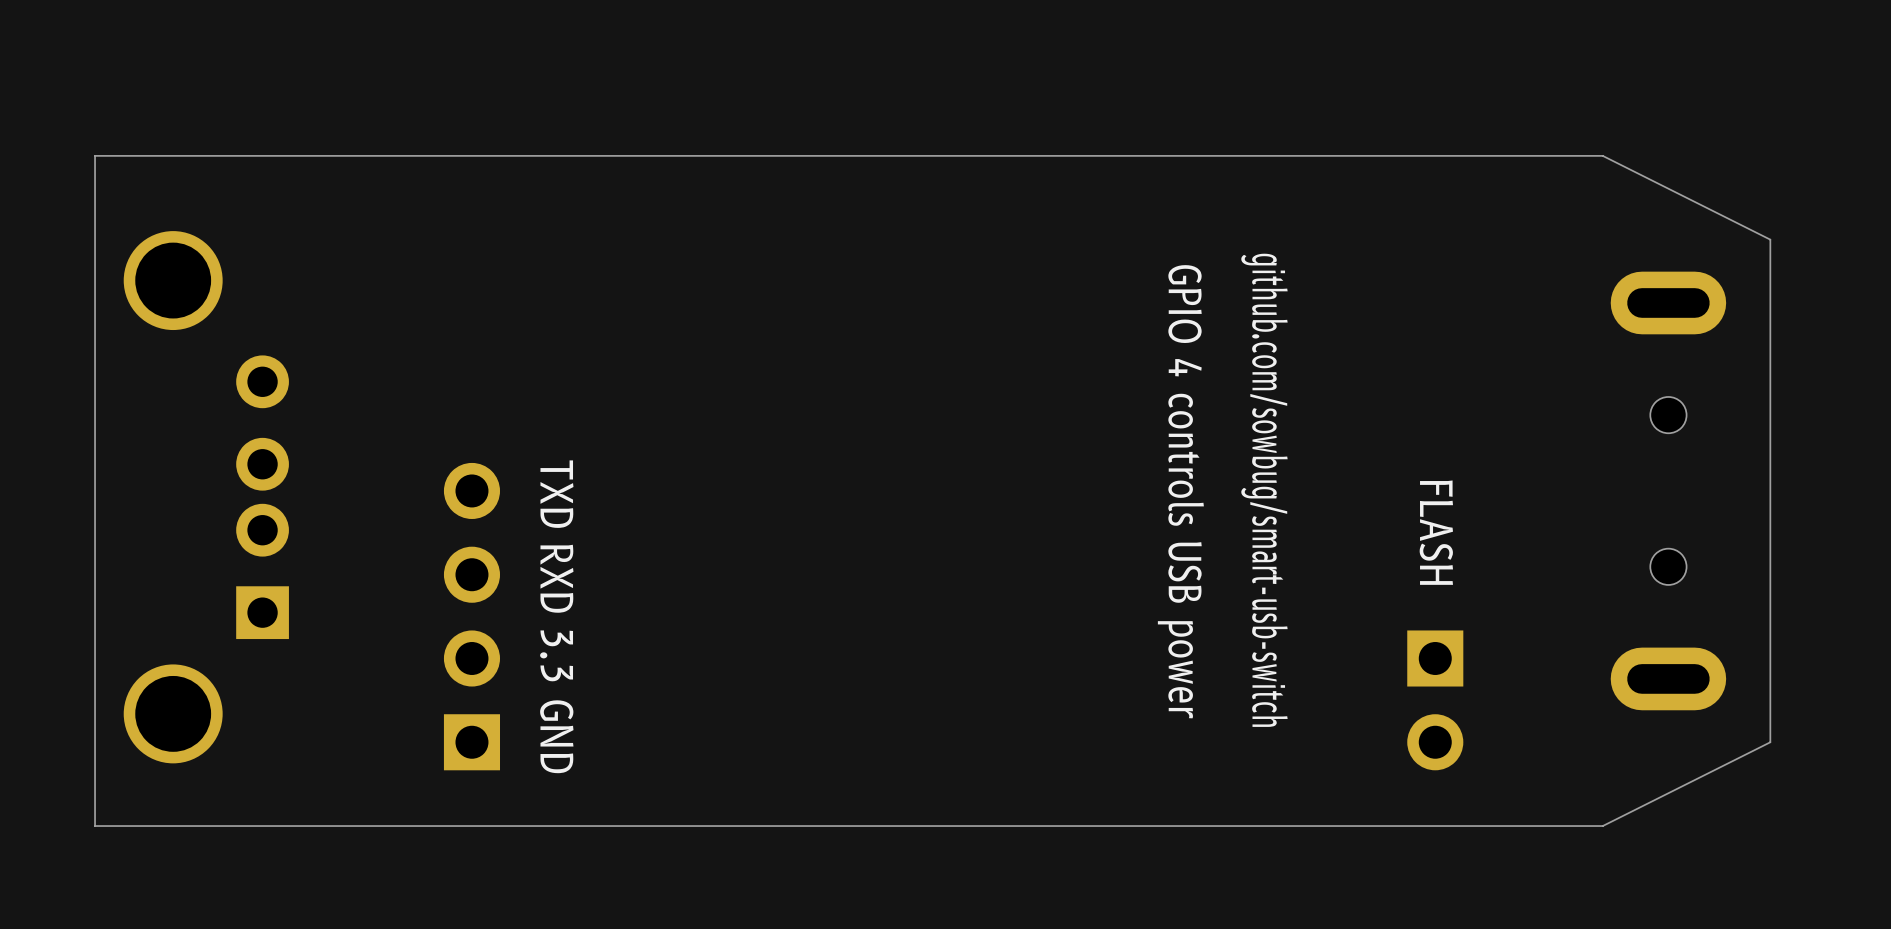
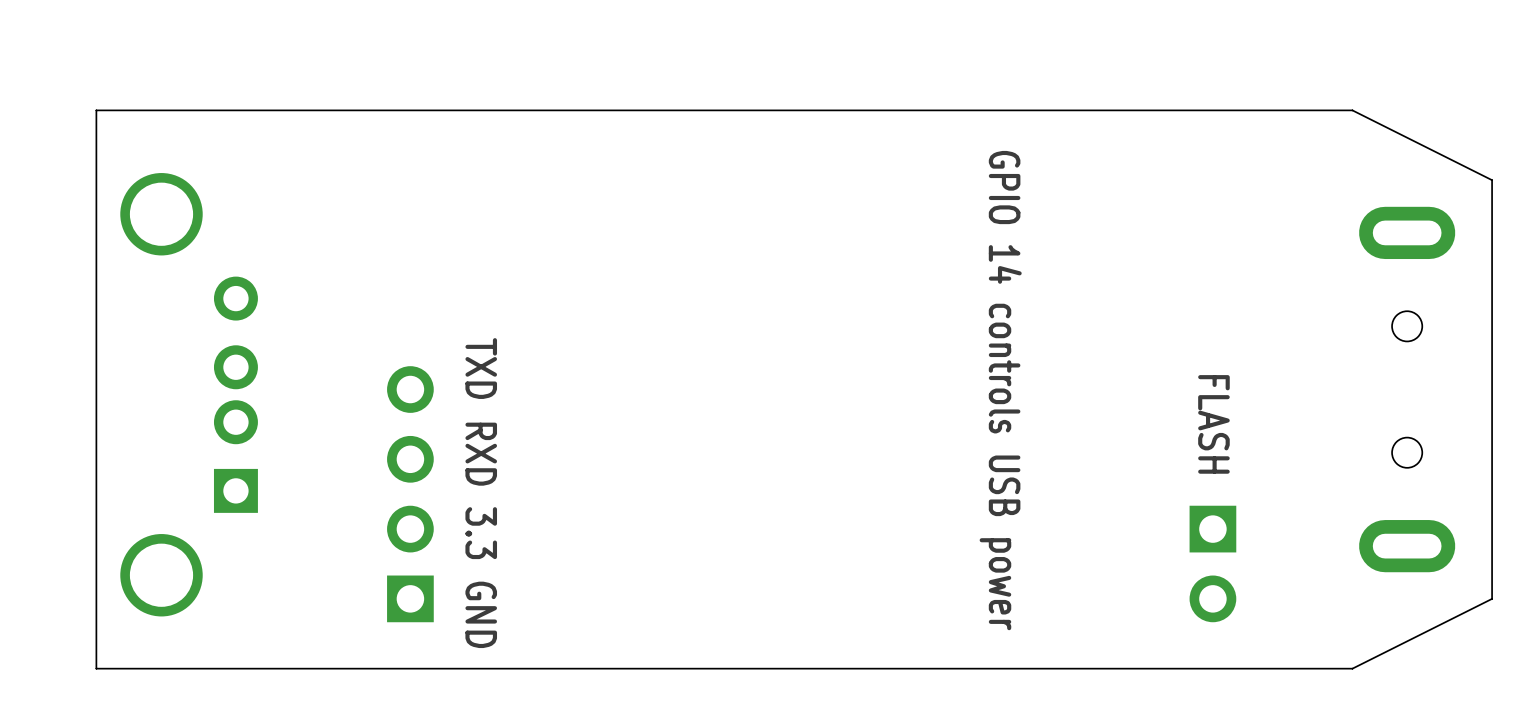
text: github.com/sowbug/smart-usb-switch (1264, 490) -> none
text: GPIO 4 controls USB power (1180, 491) -> GPIO 14 controls USB power (1000, 390)

